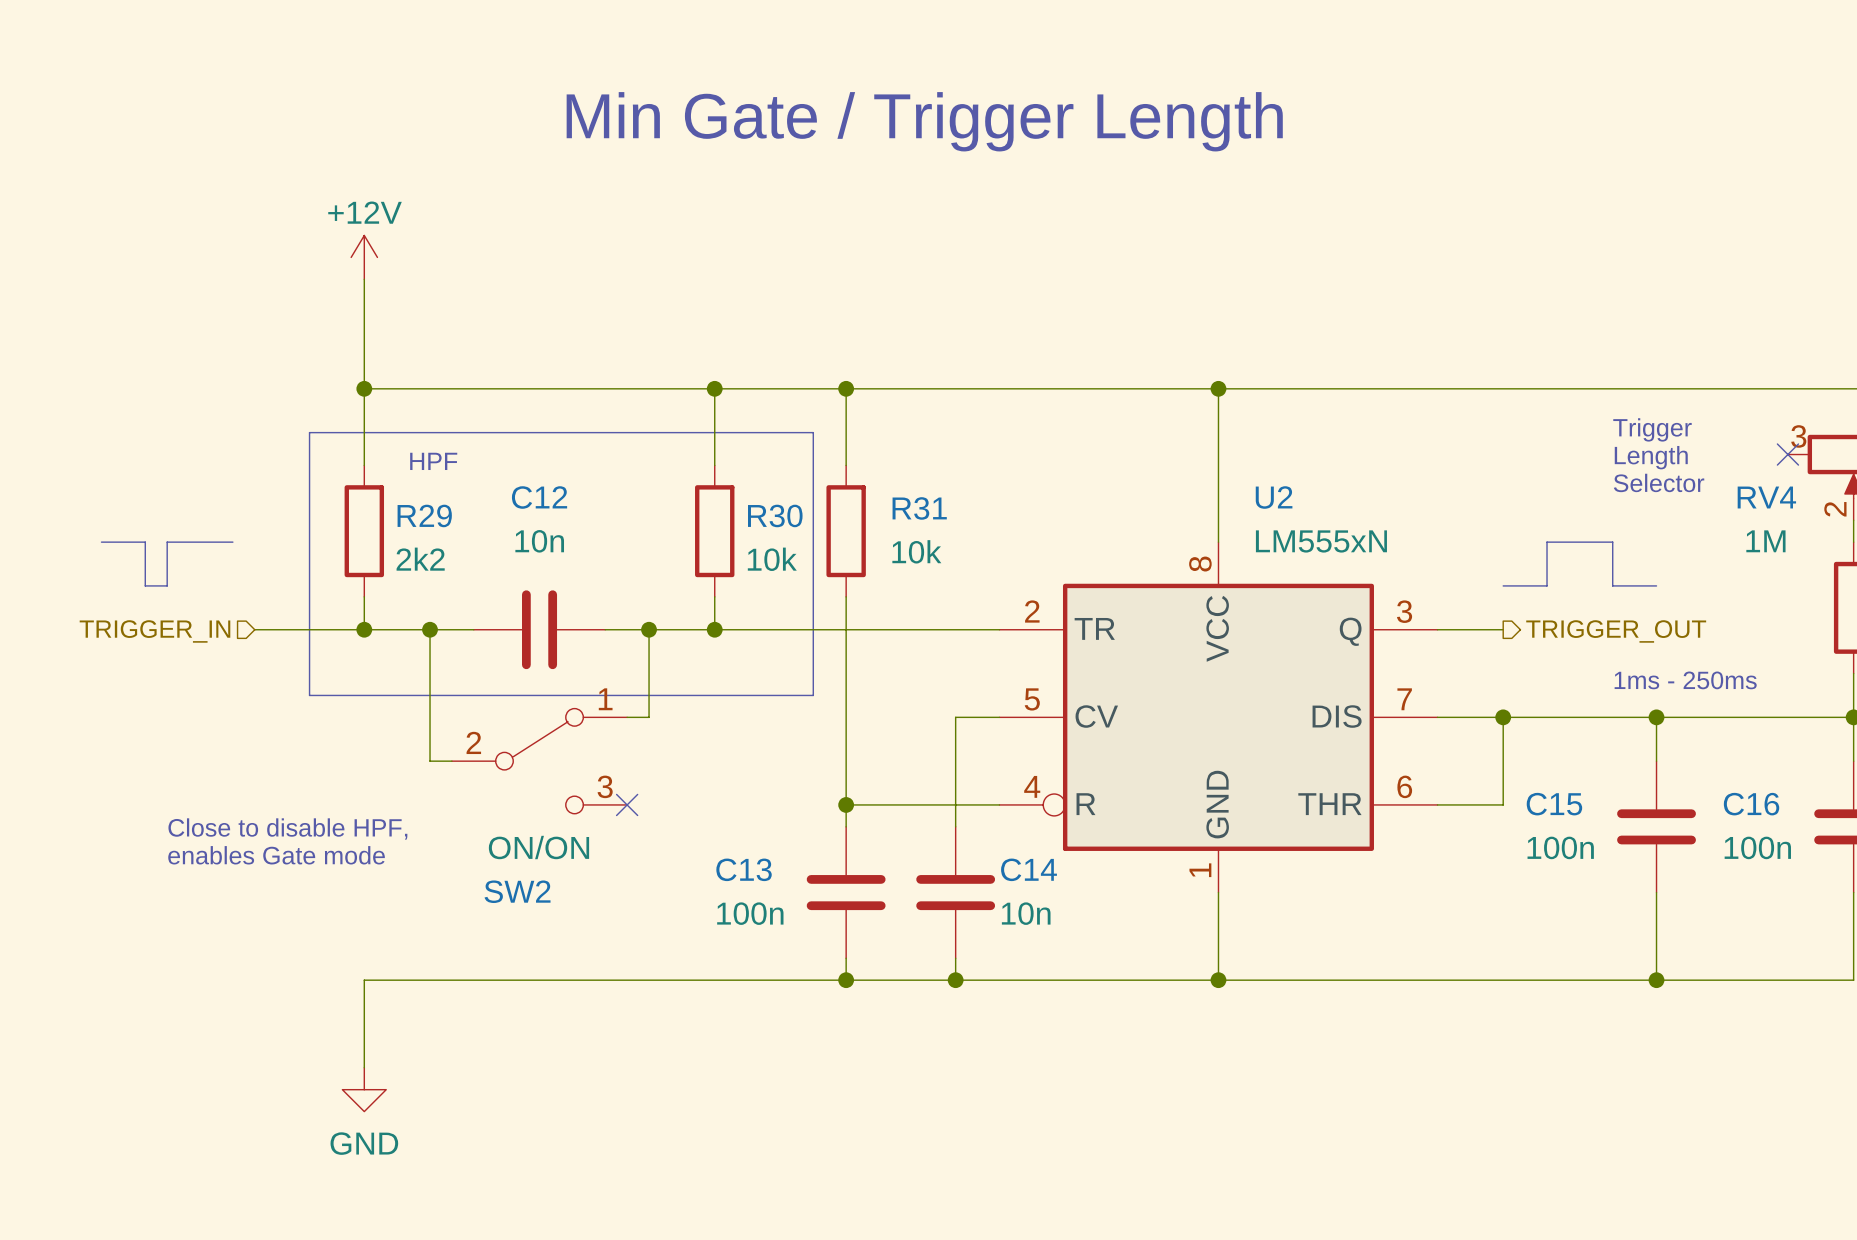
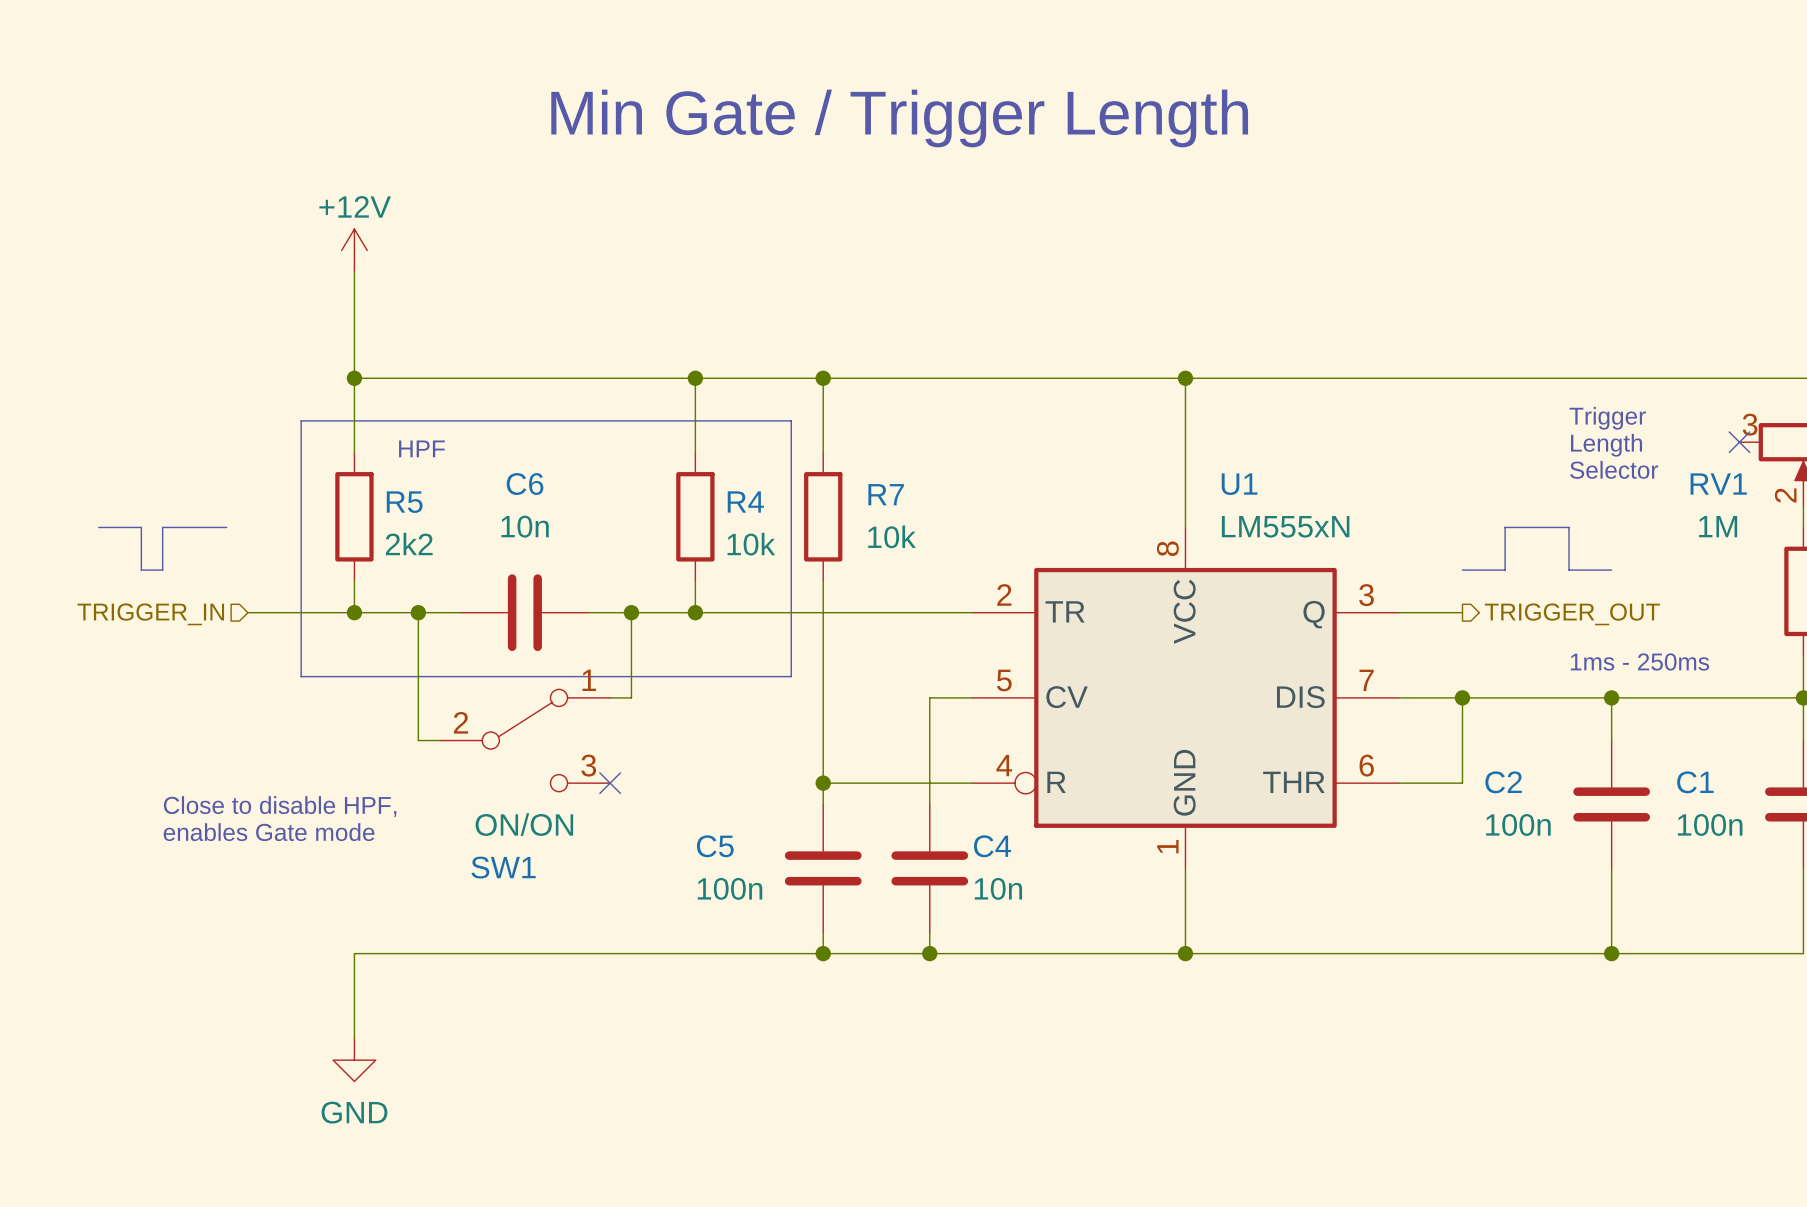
C12 name: C12 (539, 497) -> C6 (525, 484)
U2 name: U2 (1274, 497) -> U1 (1239, 484)
RV4 name: RV4 (1766, 497) -> RV1 (1718, 484)
R31 name: R31 (919, 508) -> R7 (886, 494)
R29 name: R29 (424, 515) -> R5 (404, 502)
R30 name: R30 (775, 515) -> R4 (745, 501)
C15 name: C15 (1554, 804) -> C2 (1503, 782)
C16 name: C16 (1751, 804) -> C1 (1695, 782)
C13 name: C13 (744, 869) -> C5 (715, 846)
C14 name: C14 (1029, 869) -> C4 (992, 846)
SW2 name: SW2 (517, 891) -> SW1 (503, 867)

